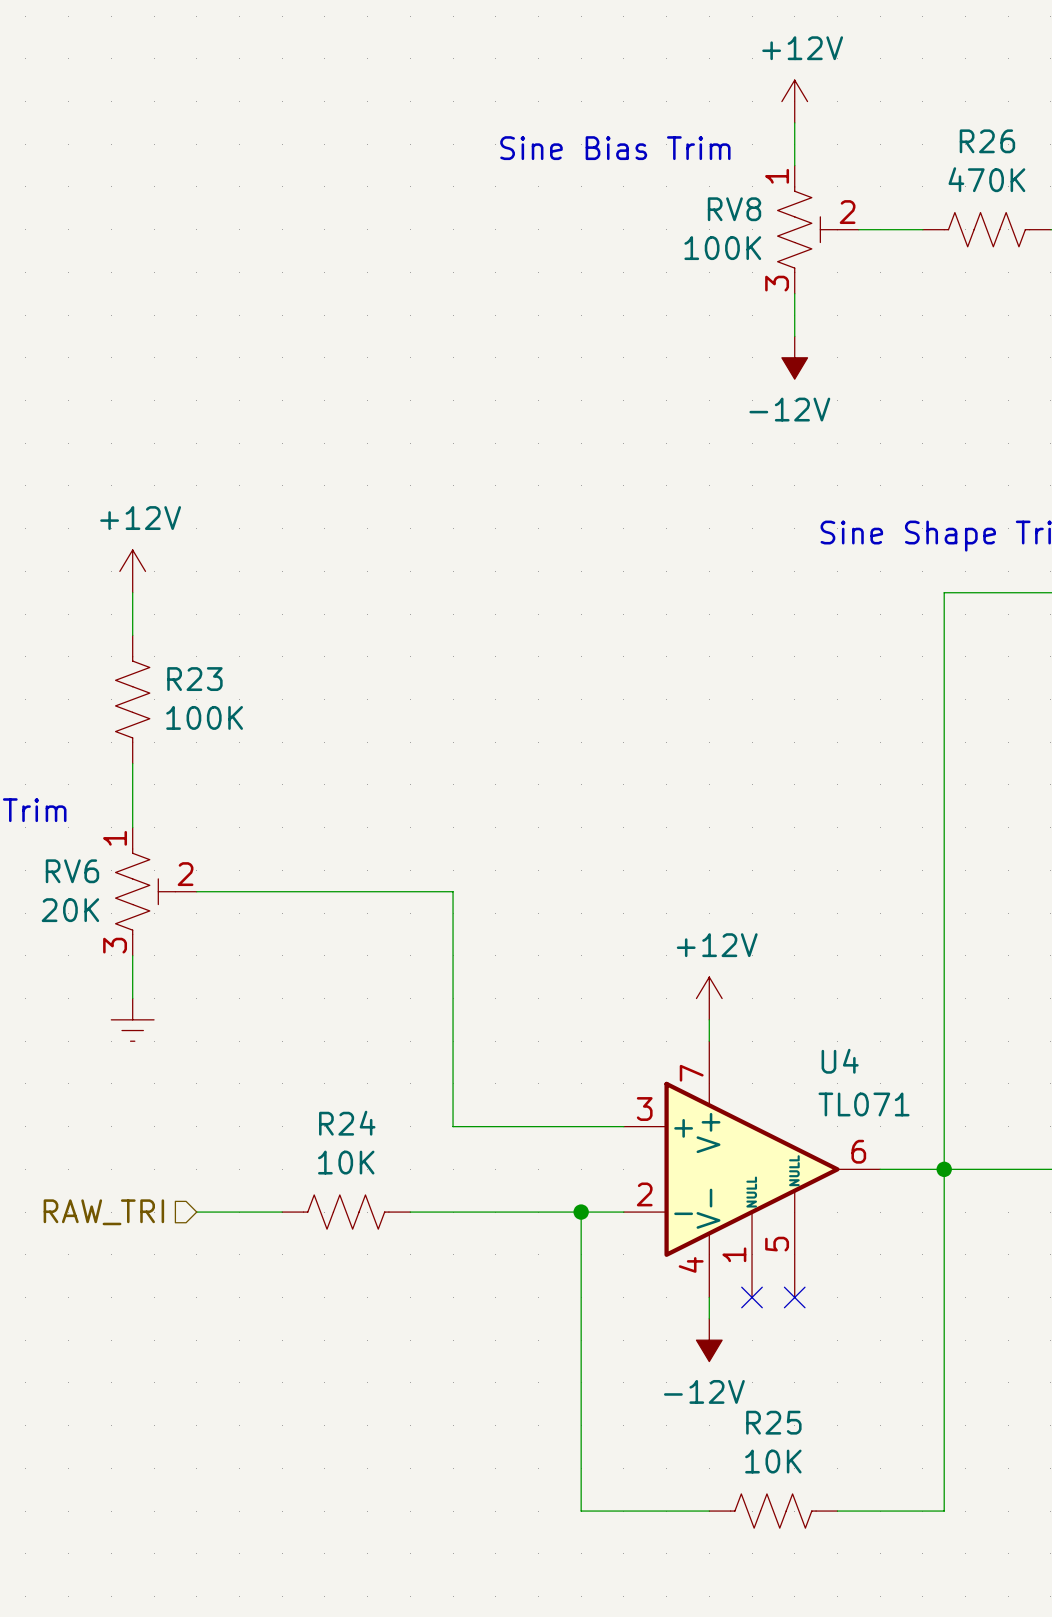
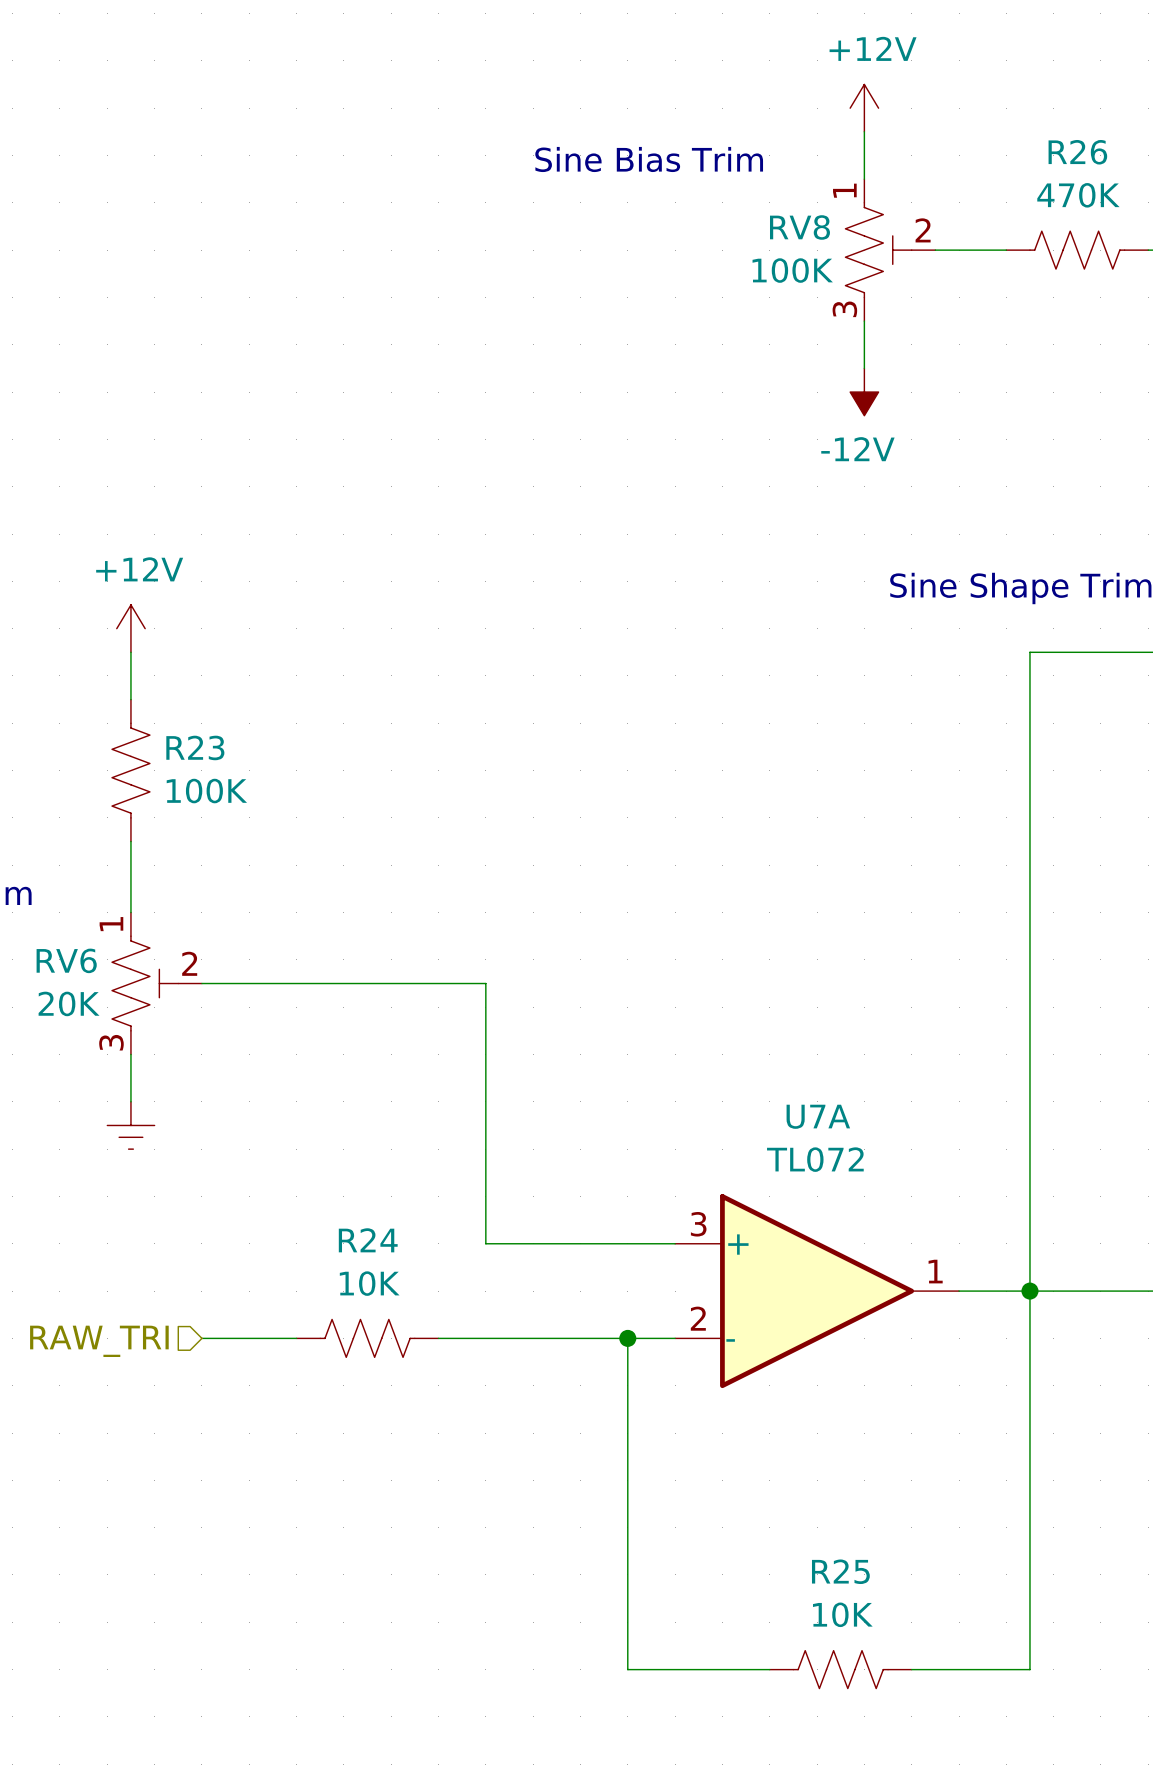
power symbol: +12V (709, 998) -> none
wire: (709, 1019) (709, 1041) -> none
U4: TL071 (752, 1169) -> none
U7A: none -> TL072 (817, 1291)
wire: (709, 1297) (709, 1318) -> none
no-connect mark: (752, 1297) -> none
no-connect mark: (794, 1297) -> none
power symbol: -12V (709, 1340) -> none

